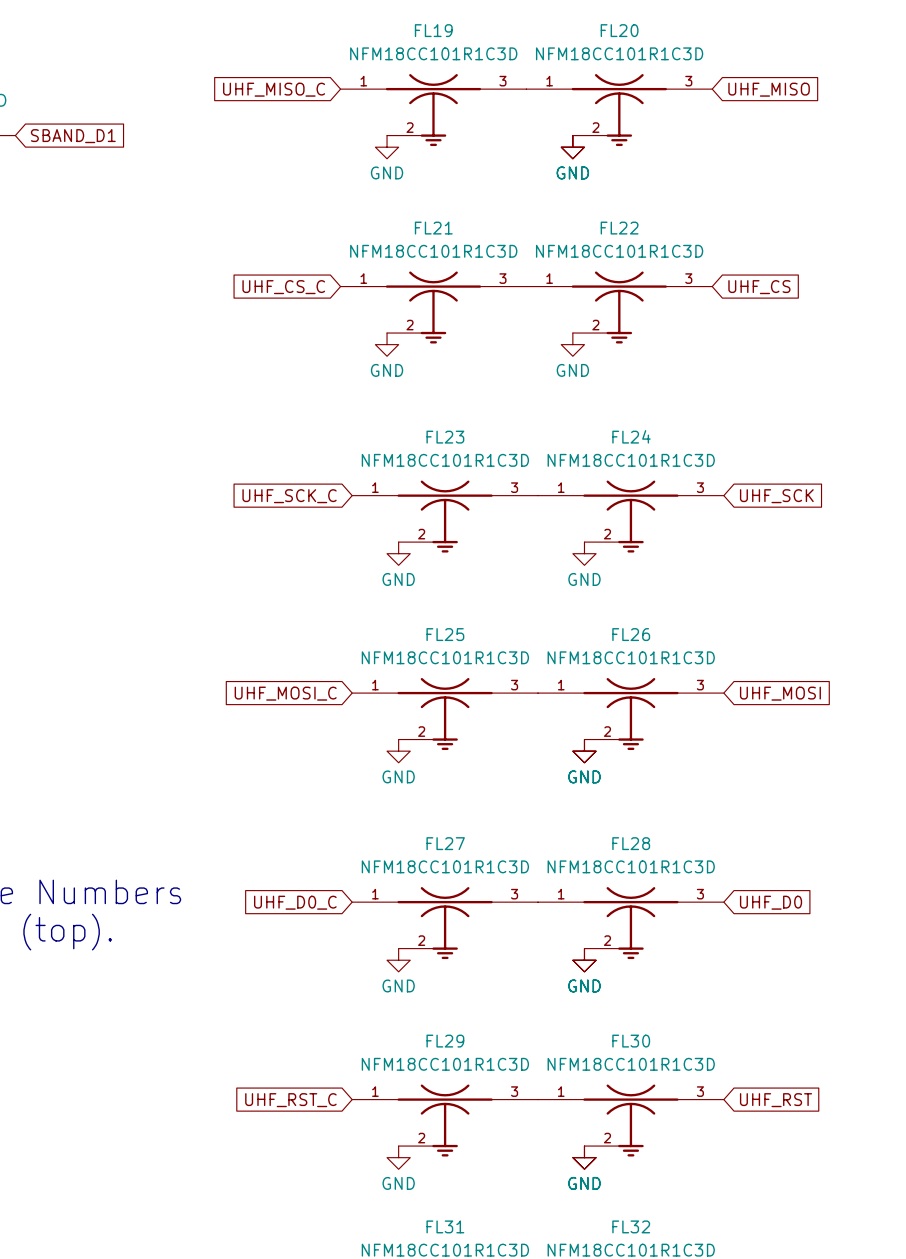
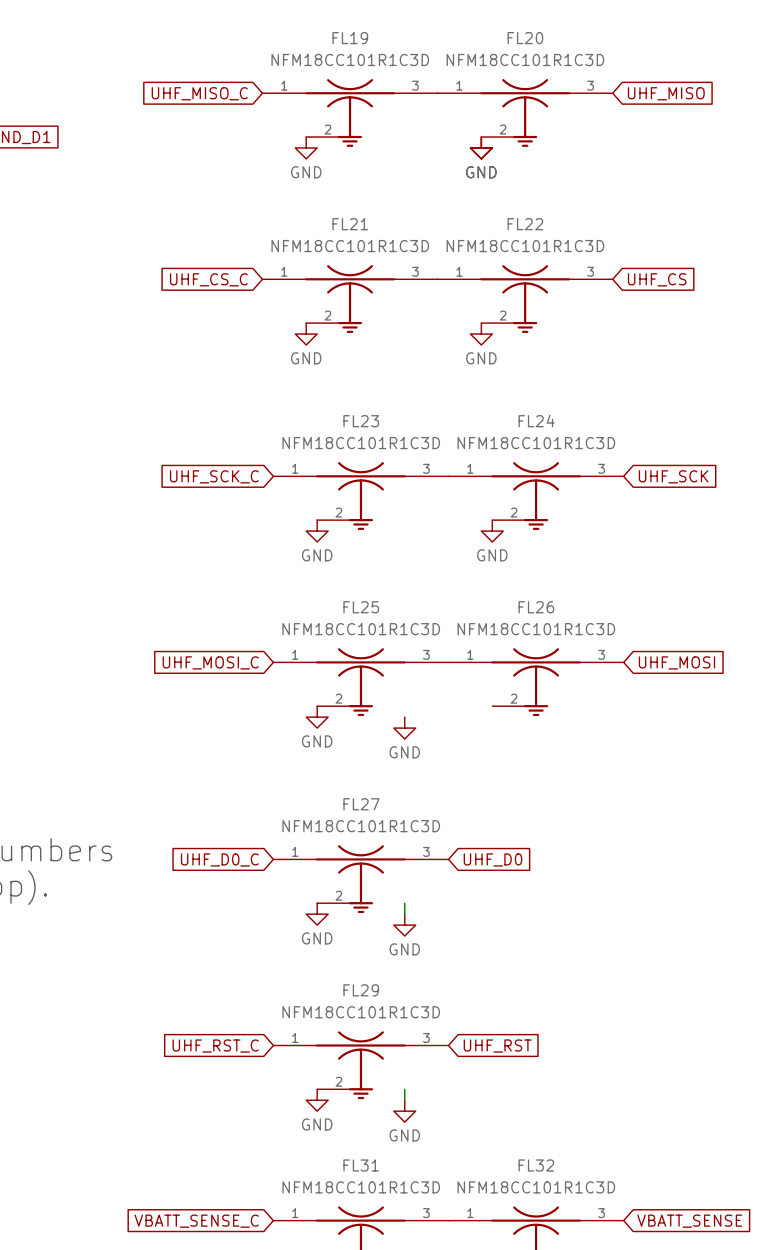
power symbol position: GND (584, 751) -> GND (404, 728)
global label position: UHF_D0 (771, 902) -> UHF_D0 (492, 859)
FL28: NFM18CC101R1C3D (630, 923) -> none
wire: none -> (404, 903) (404, 914)
power symbol position: GND (584, 960) -> GND (404, 925)
global label position: UHF_RST (776, 1100) -> UHF_RST (497, 1046)
FL30: NFM18CC101R1C3D (630, 1120) -> none
wire: none -> (404, 1089) (404, 1100)
power symbol position: GND (584, 1157) -> GND (404, 1111)

